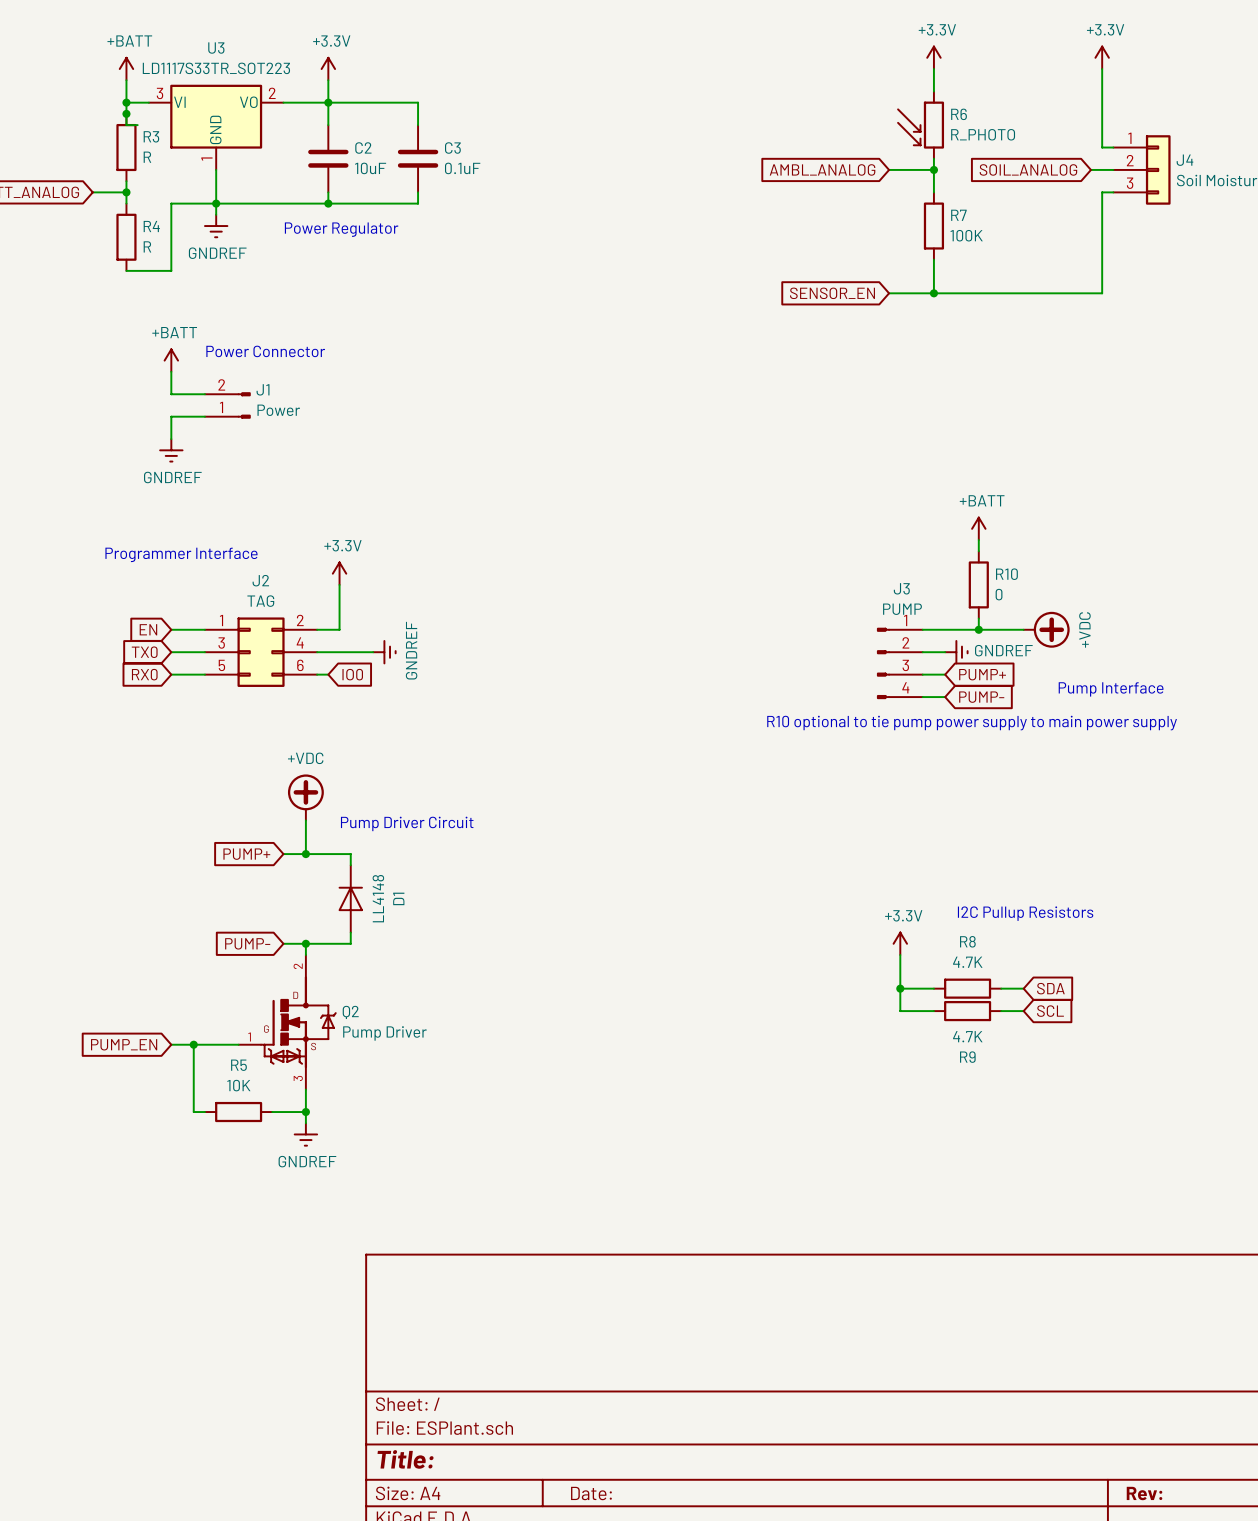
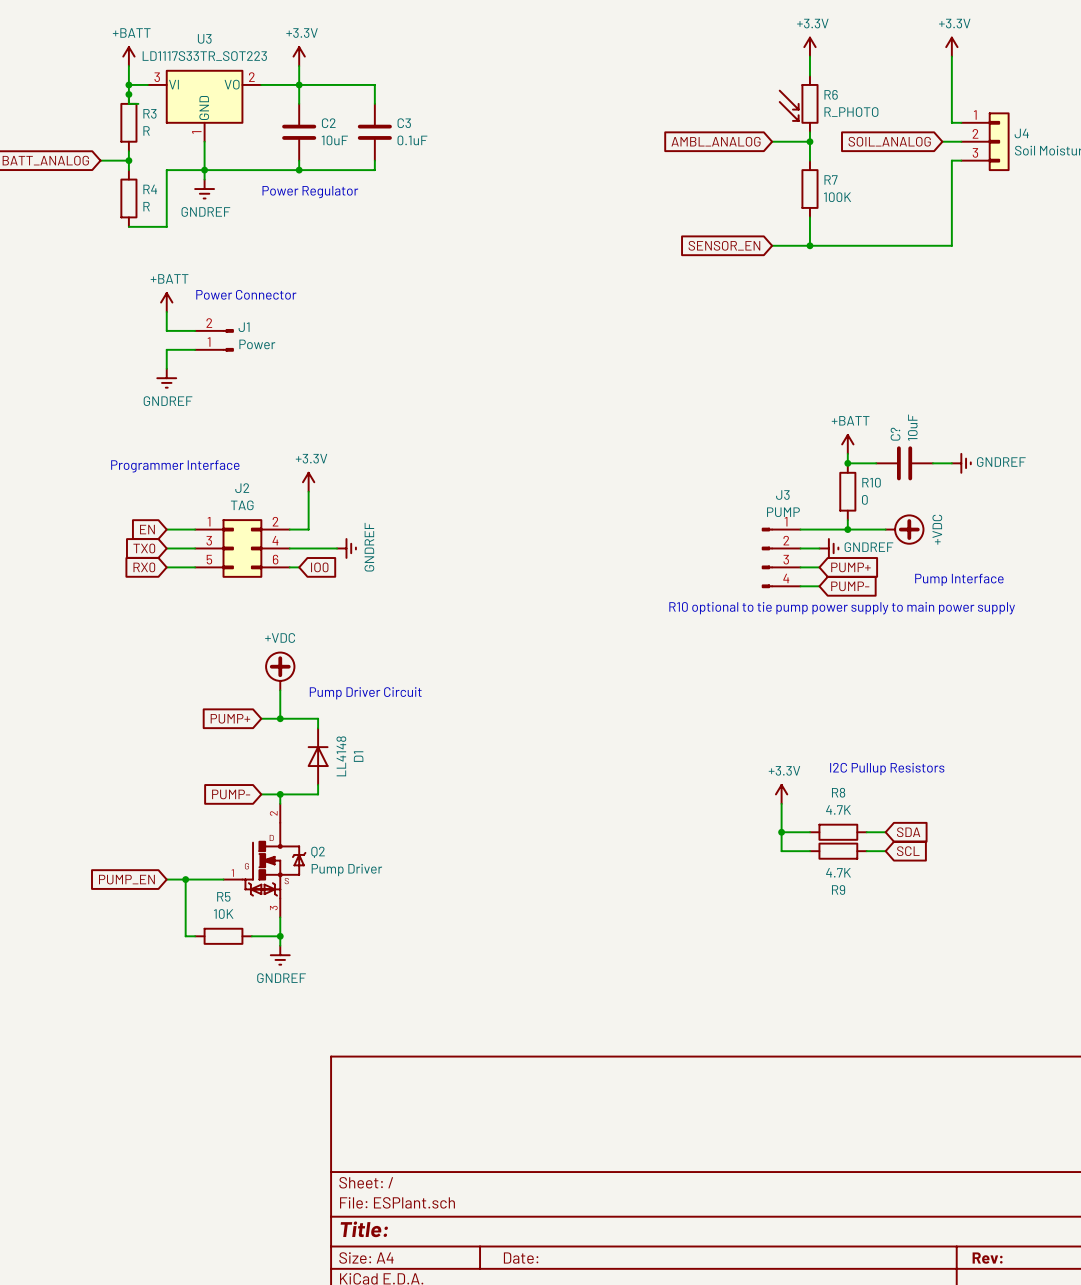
wire: none -> (847, 463) (876, 463)
junction: none -> (847, 463)
C?: none -> 10uF (904, 463)
wire: none -> (932, 463) (951, 463)
power symbol: none -> GNDREF (961, 463)

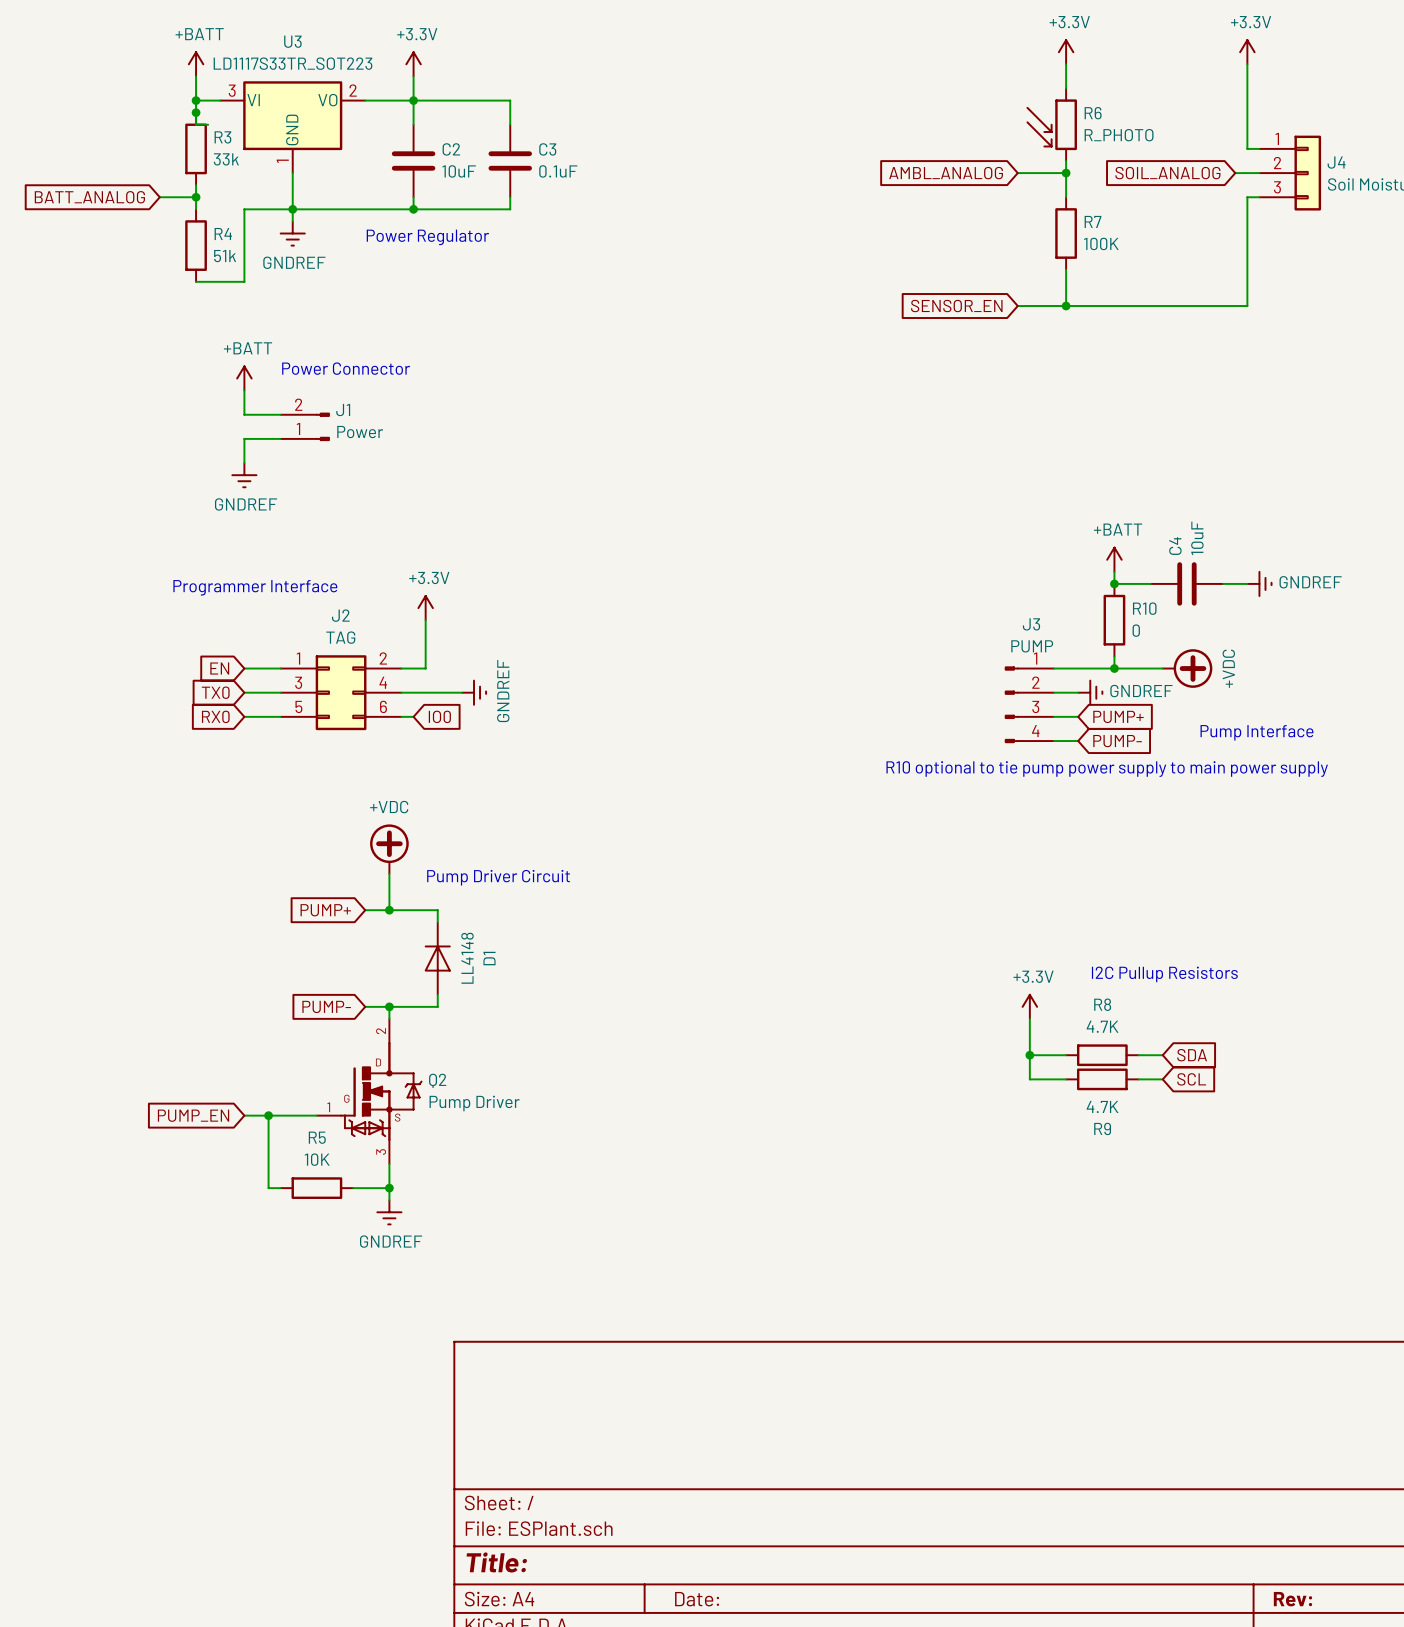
R3 value: R (146, 130) -> 33k (226, 159)
R4 value: R (146, 206) -> 51k (225, 256)
C? name: C? (895, 434) -> C4 (1175, 546)

